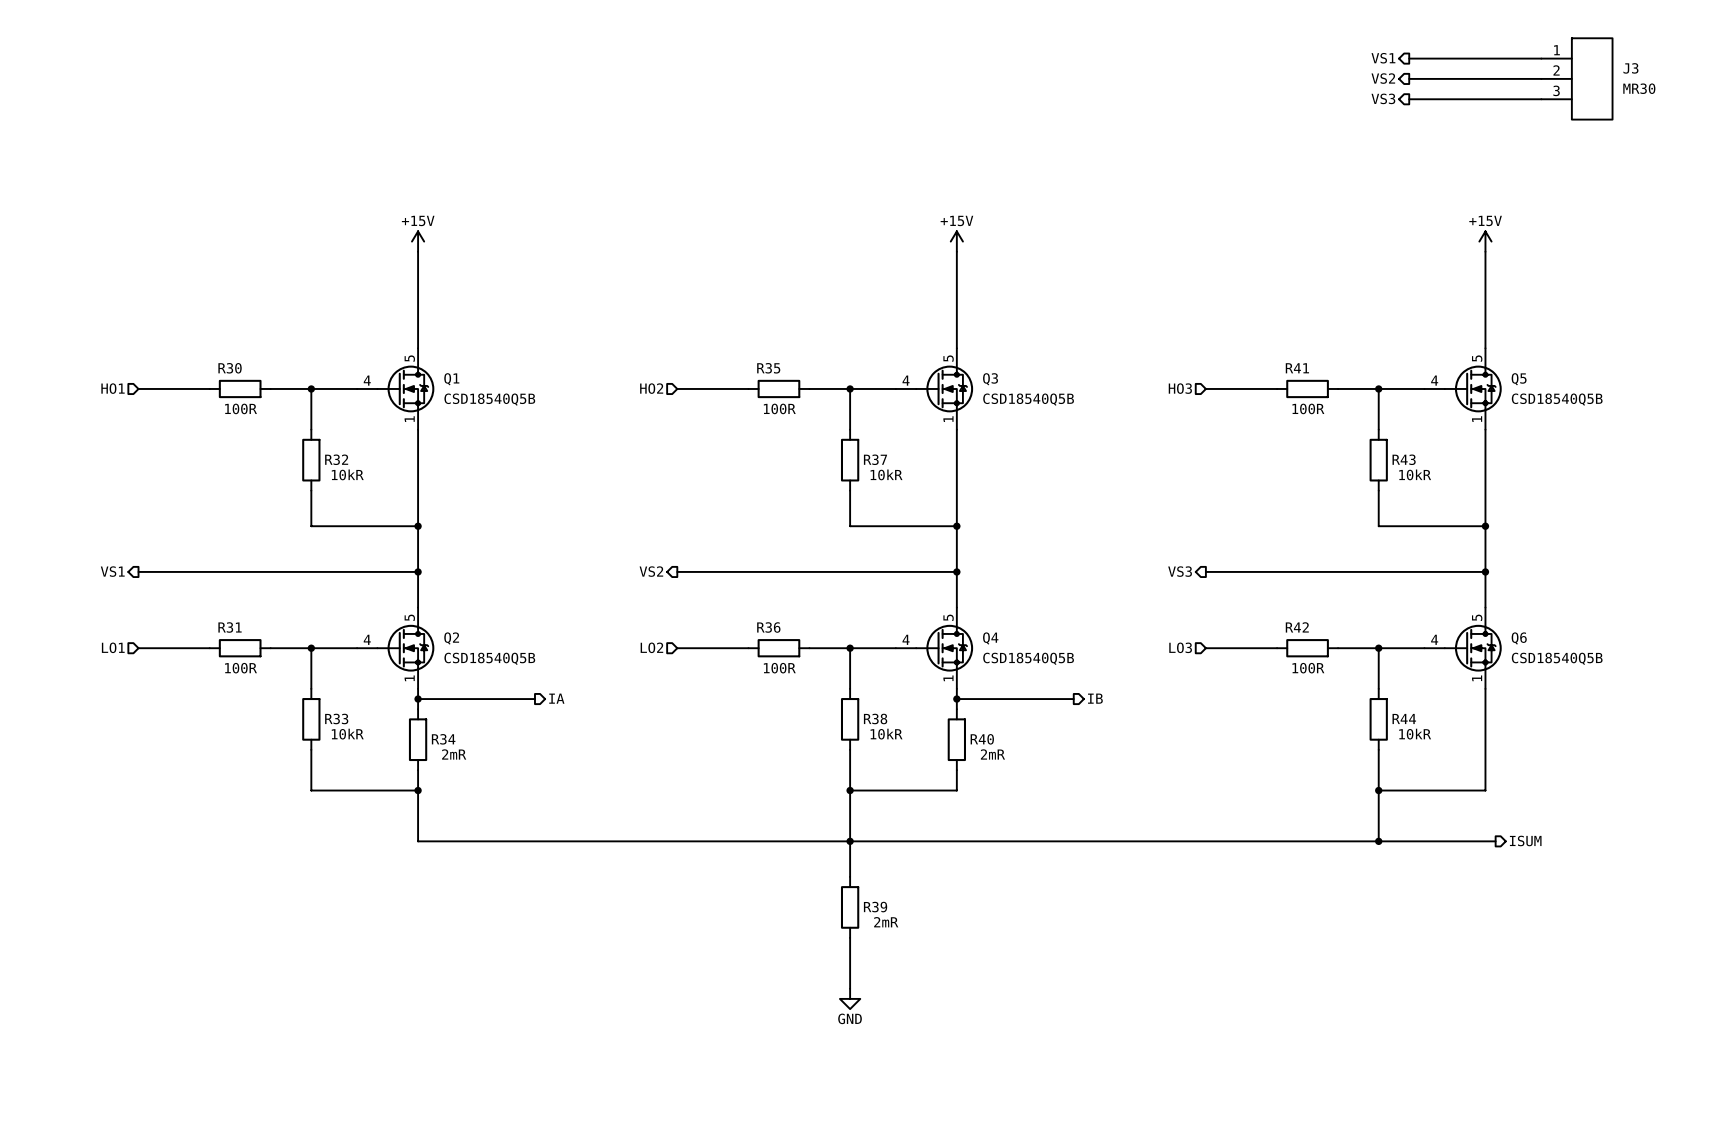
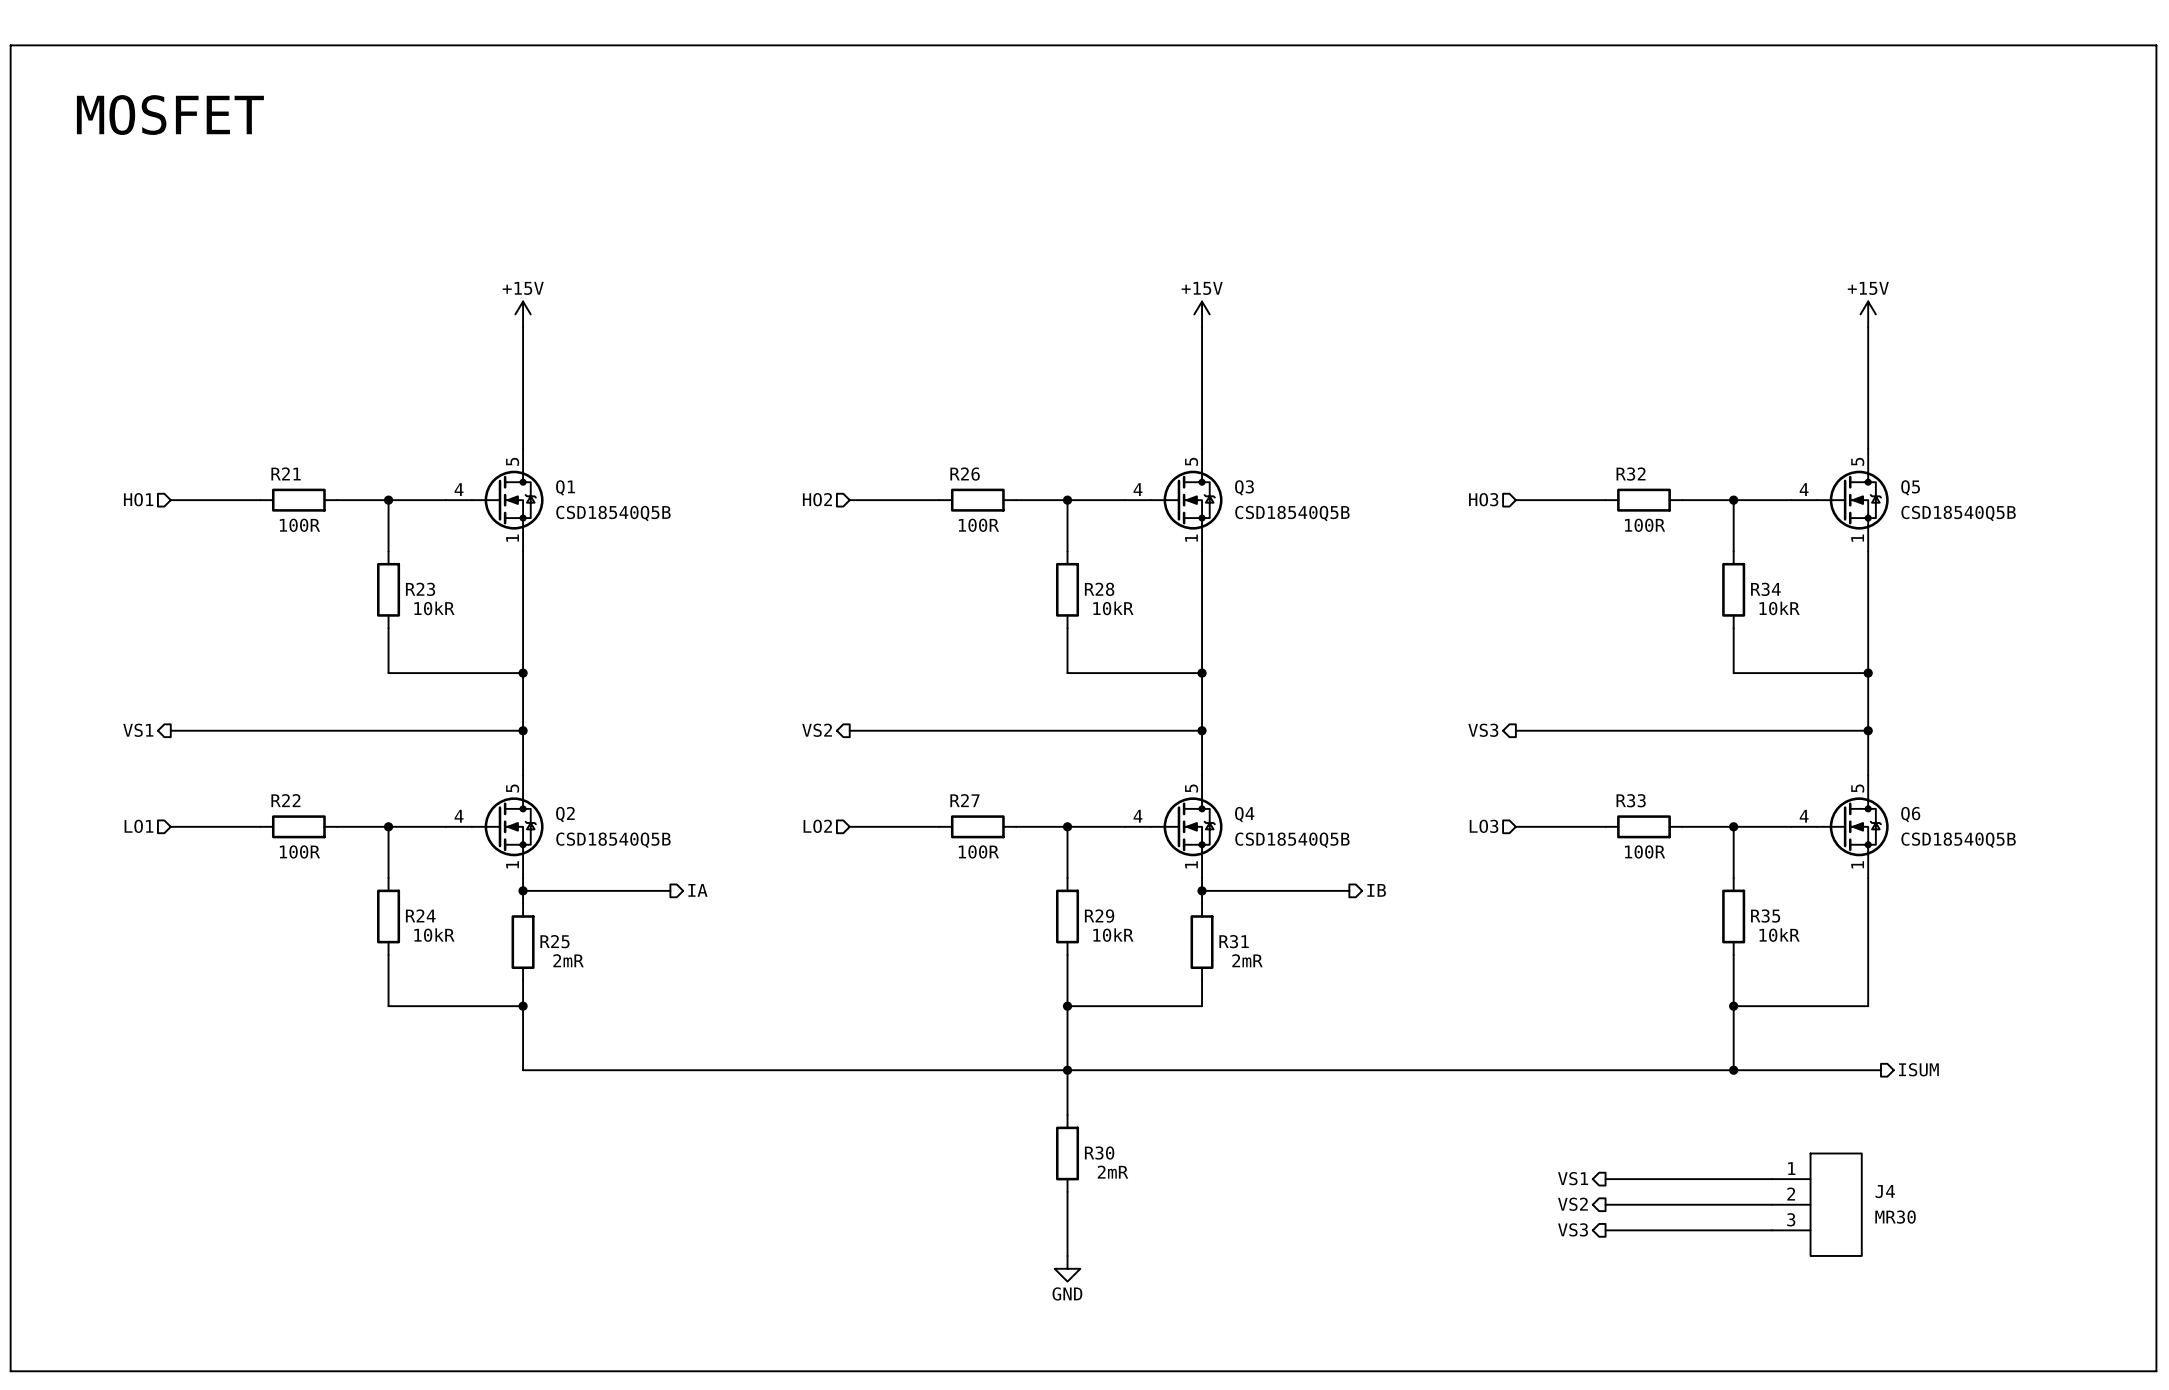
line: none -> (10, 45) (10, 1371) (2156, 1371) (2156, 45) (10, 45)
hierarchical label: VS1 (1383, 58) -> none
wire: (1409, 58) (1541, 58) -> none
hierarchical label: VS2 (1383, 78) -> none
wire: (1409, 78) (1541, 78) -> none
J3: MR30 (1576, 78) -> none
text: none -> MOSFET (170, 115)
hierarchical label: VS3 (1383, 98) -> none
wire: (1409, 99) (1541, 99) -> none
R30 name: R30 (230, 368) -> R21 (286, 473)
R35 name: R35 (768, 368) -> R26 (965, 474)
R41 name: R41 (1297, 368) -> R32 (1631, 474)
R32 name: R32 (336, 459) -> R23 (420, 589)
R37 name: R37 (875, 459) -> R28 (1099, 589)
R43 name: R43 (1404, 459) -> R34 (1765, 589)
R31 name: R31 (230, 627) -> R22 (285, 800)
R36 name: R36 (768, 627) -> R27 (964, 800)
R42 name: R42 (1297, 627) -> R33 (1631, 800)
R33 name: R33 (336, 718) -> R24 (420, 915)
R38 name: R38 (875, 718) -> R29 (1099, 916)
R44 name: R44 (1404, 718) -> R35 (1765, 916)
R34 name: R34 (443, 739) -> R25 (555, 941)
R40 name: R40 (982, 739) -> R31 (1234, 941)
R39 name: R39 (875, 907) -> R30 (1099, 1153)
hierarchical label: none -> VS1 (1573, 1178)
wire: none -> (1605, 1179) (1772, 1179)
hierarchical label: none -> VS2 (1572, 1204)
wire: none -> (1605, 1204) (1772, 1204)
J4: none -> MR30 (1816, 1204)
hierarchical label: none -> VS3 (1573, 1229)
wire: none -> (1605, 1230) (1772, 1230)

